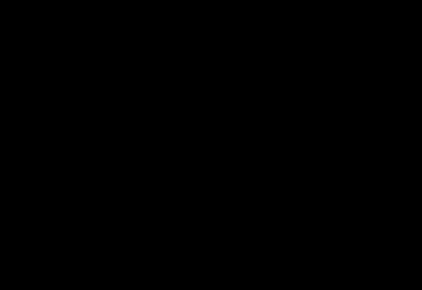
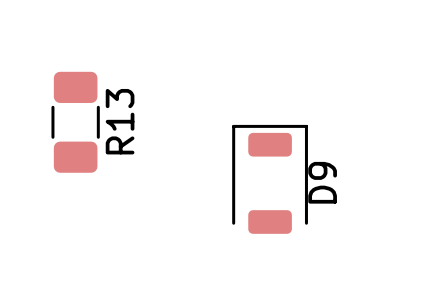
R13: none -> (75, 122)
D9: none -> (270, 179)

